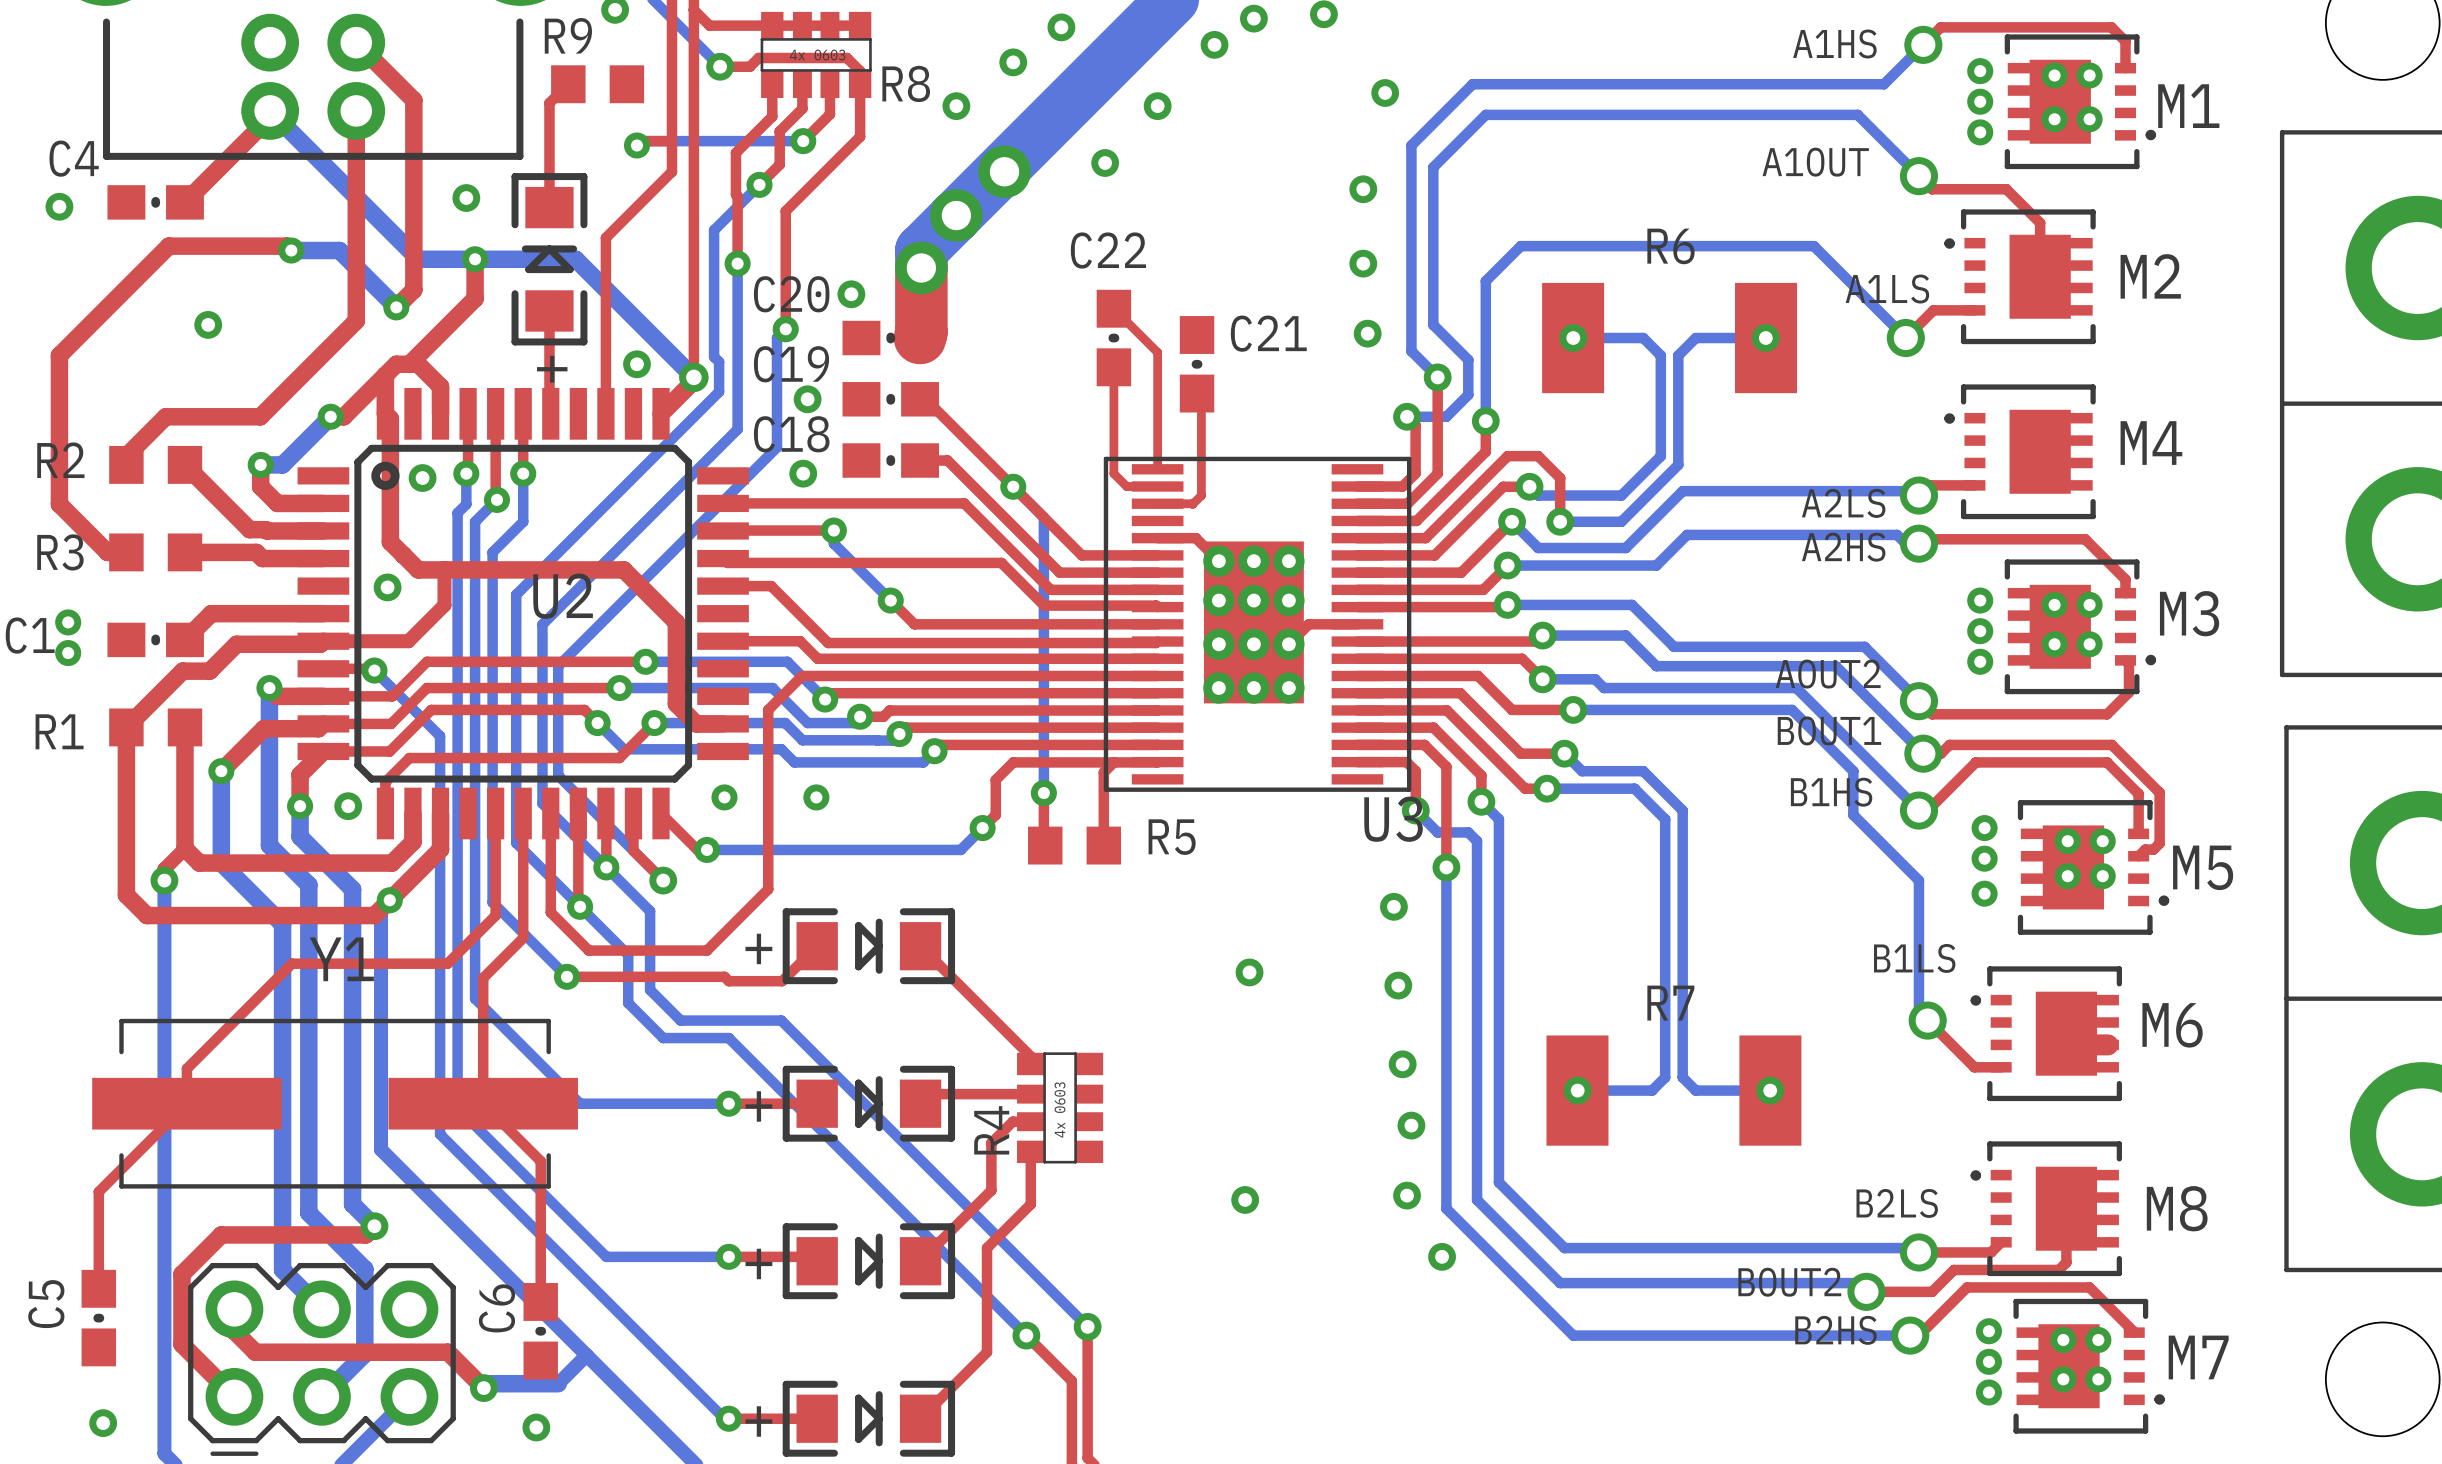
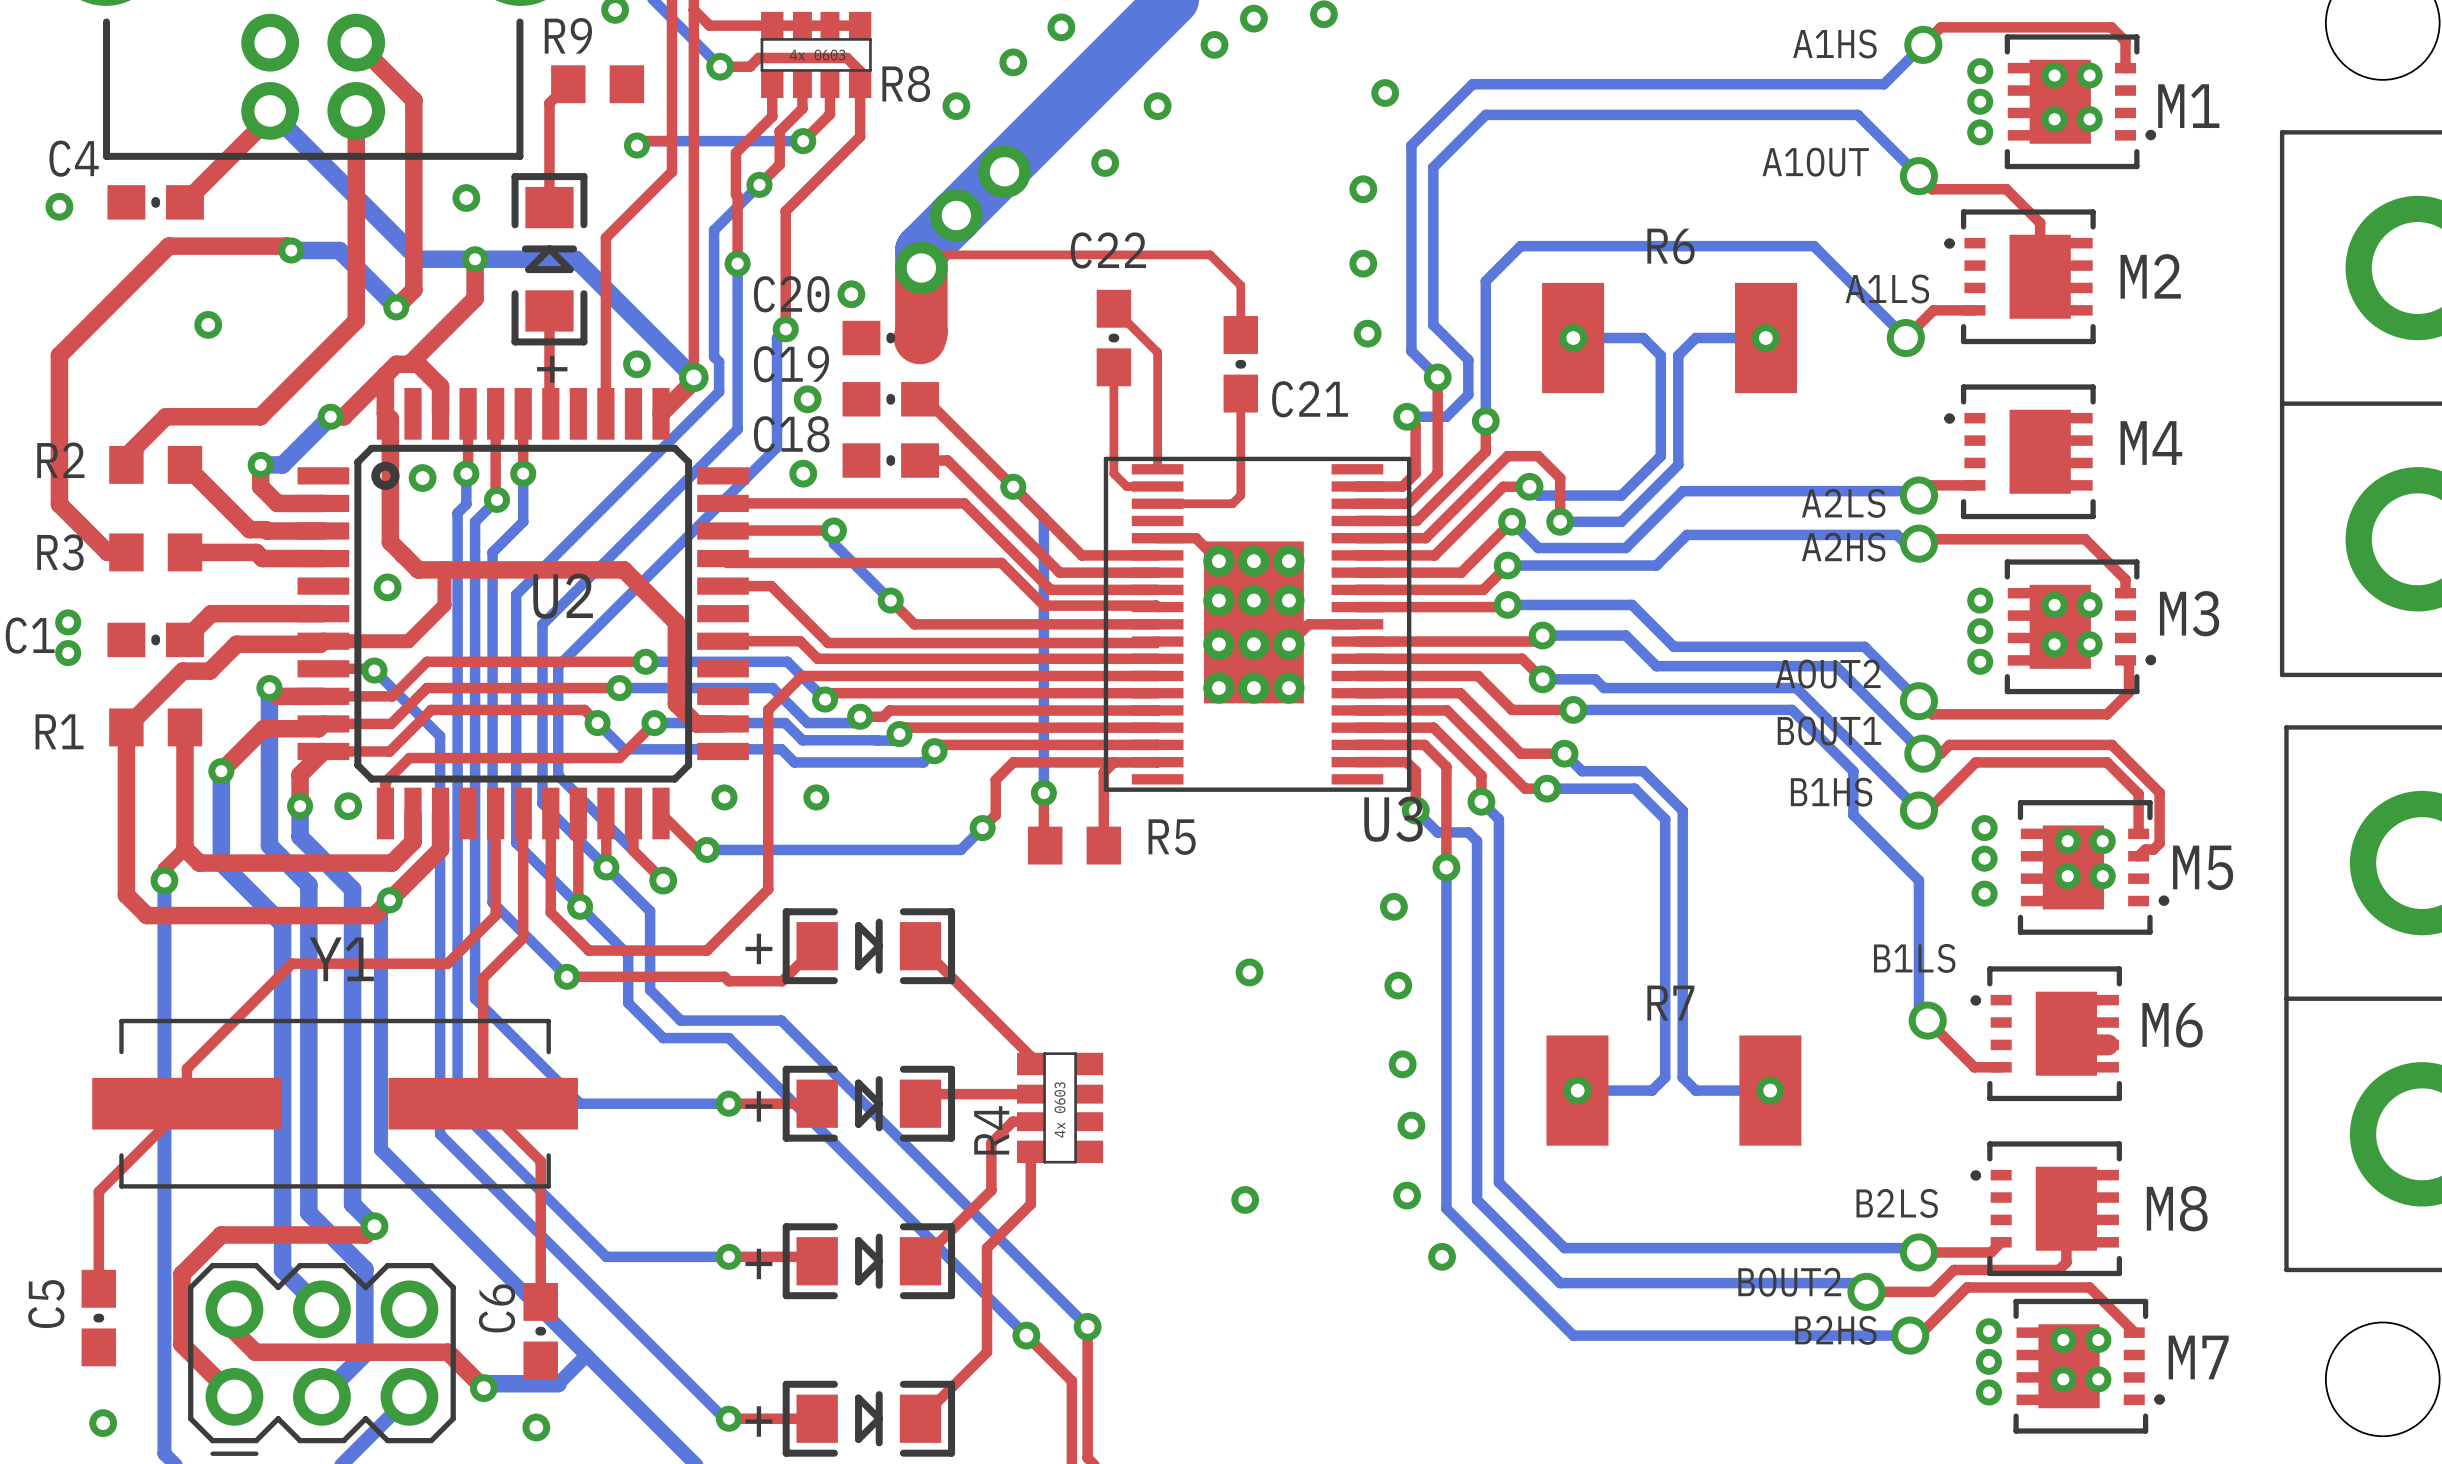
top track: none -> (921, 268) (934, 254) (1210, 254) (1240, 285) (1240, 334)
C21 name position: C21 (1268, 333) -> C21 (1310, 399)
C21 position: (1197, 364) -> (1240, 364)
top track: (1197, 393) (1201, 397) (1201, 495) (1192, 503) -> (1240, 393) (1240, 495) (1232, 503) (1192, 503)

